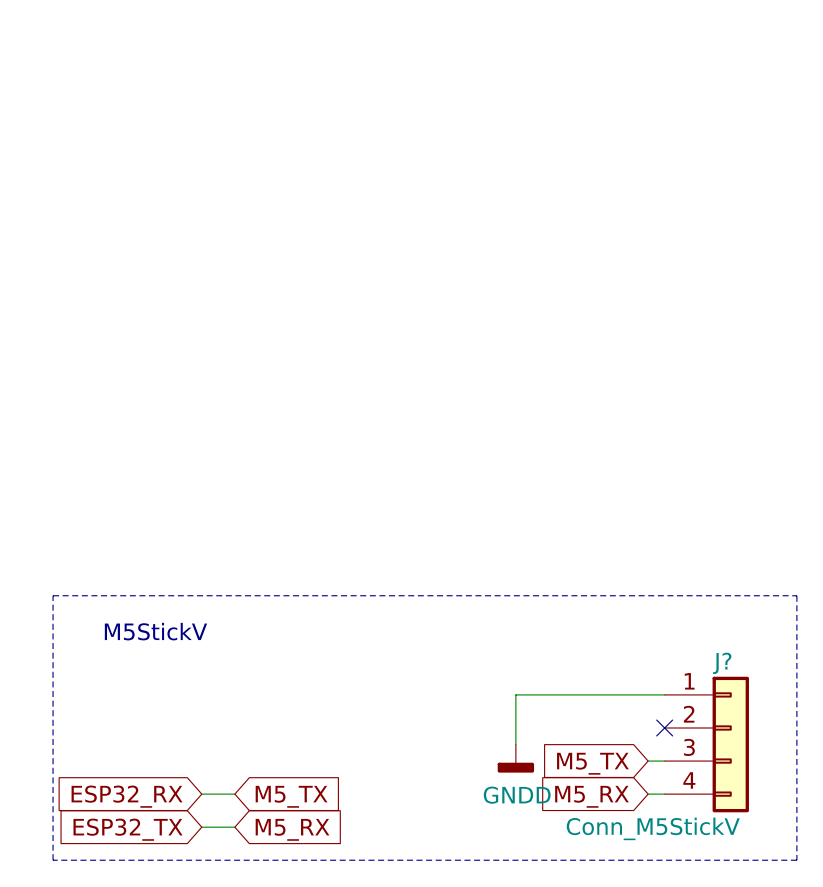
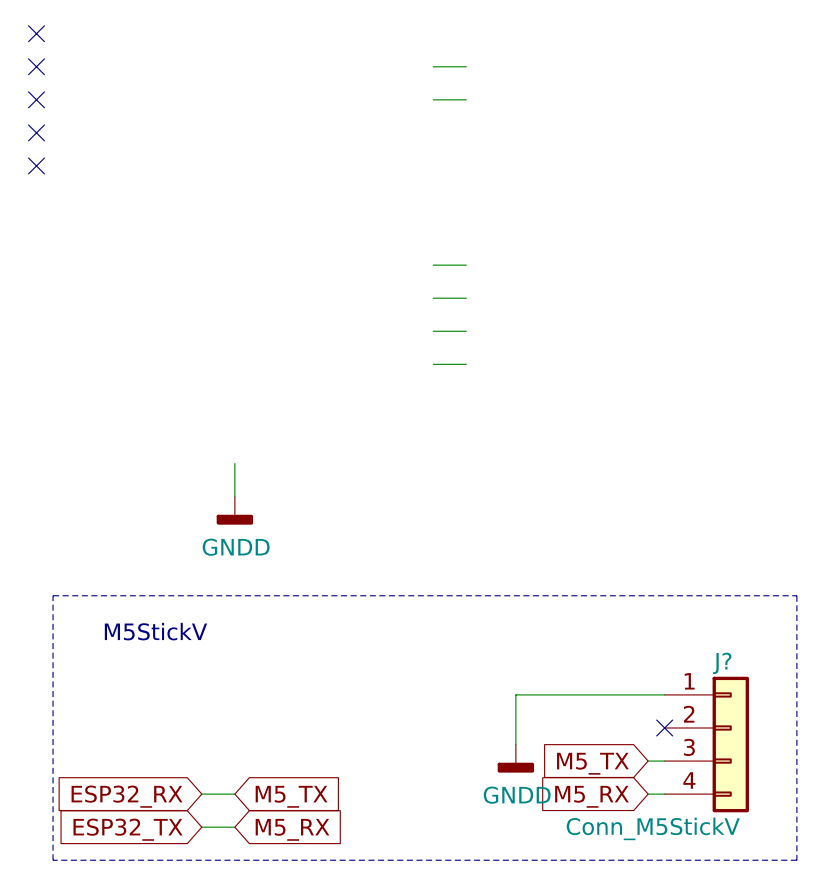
no-connect mark: none -> (36, 33)
no-connect mark: none -> (36, 66)
wire: none -> (433, 66) (466, 66)
no-connect mark: none -> (36, 99)
wire: none -> (433, 99) (466, 99)
no-connect mark: none -> (36, 132)
no-connect mark: none -> (36, 165)
wire: none -> (433, 265) (466, 265)
wire: none -> (433, 298) (466, 298)
wire: none -> (433, 331) (466, 331)
wire: none -> (433, 364) (466, 364)
wire: none -> (234, 463) (234, 496)
power symbol: none -> GNDD (234, 510)

